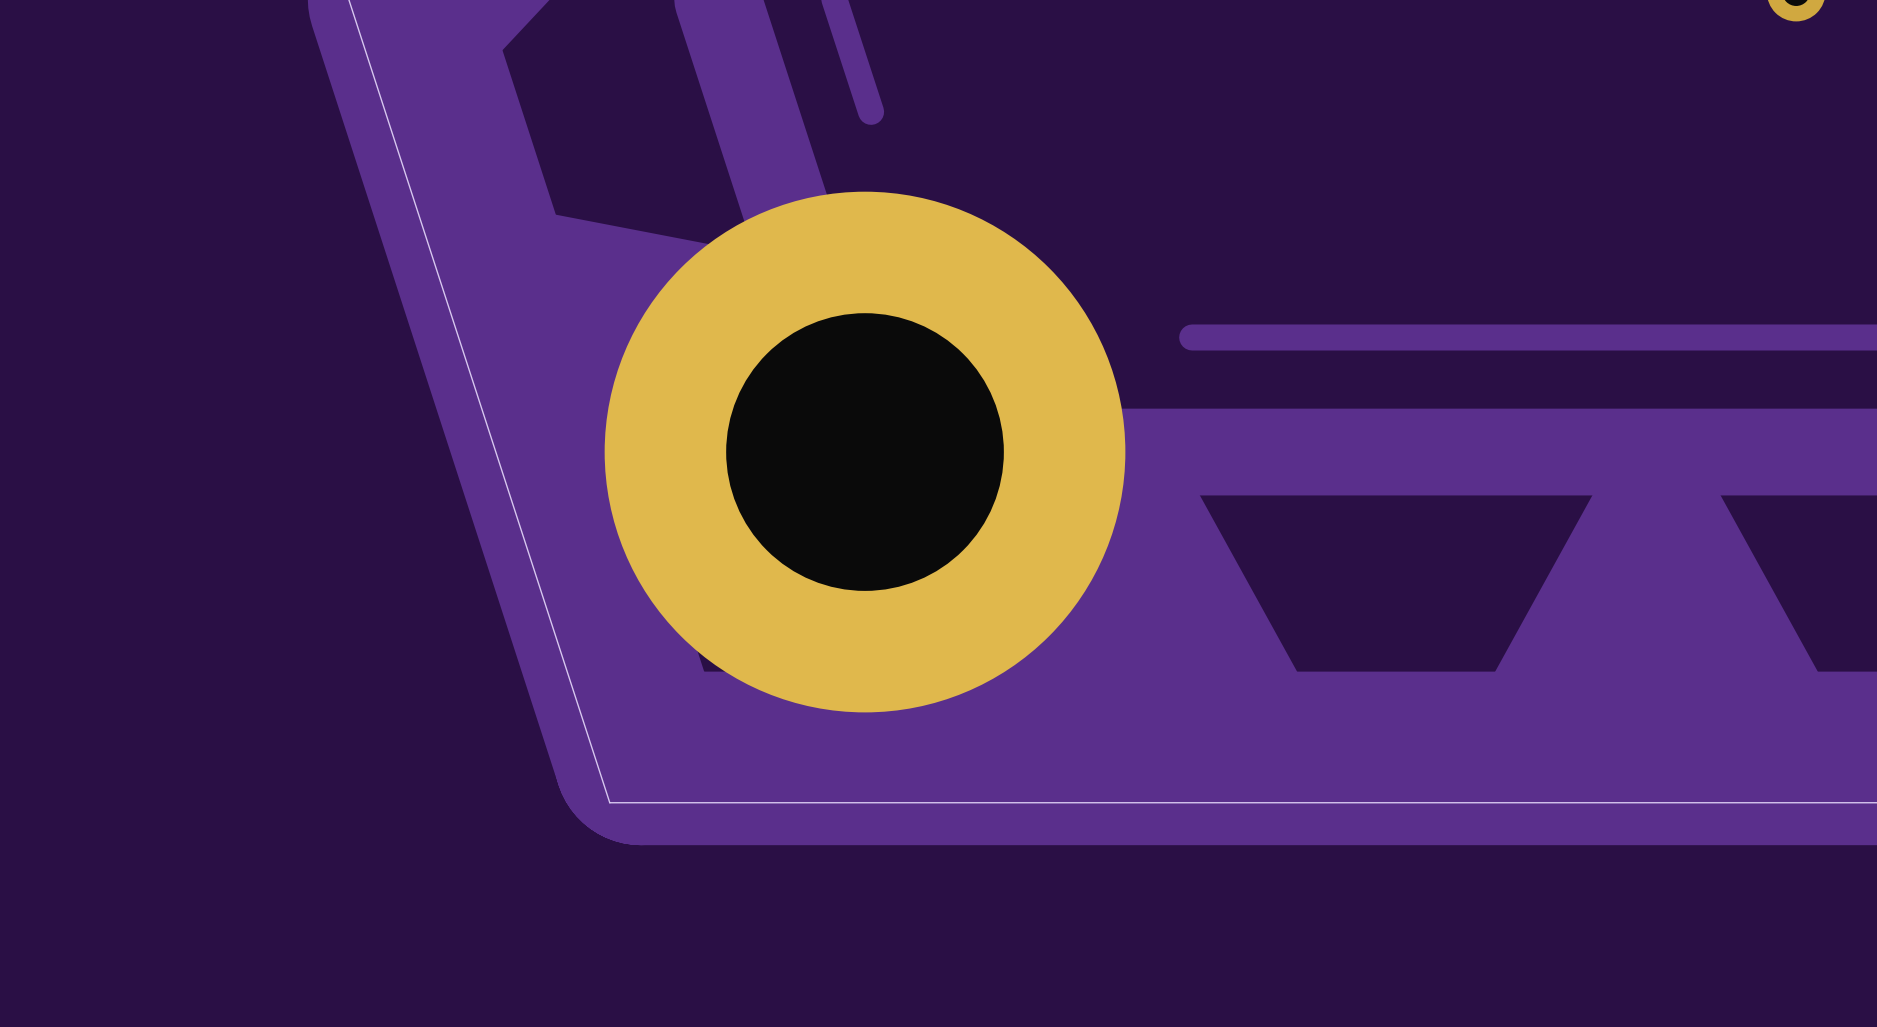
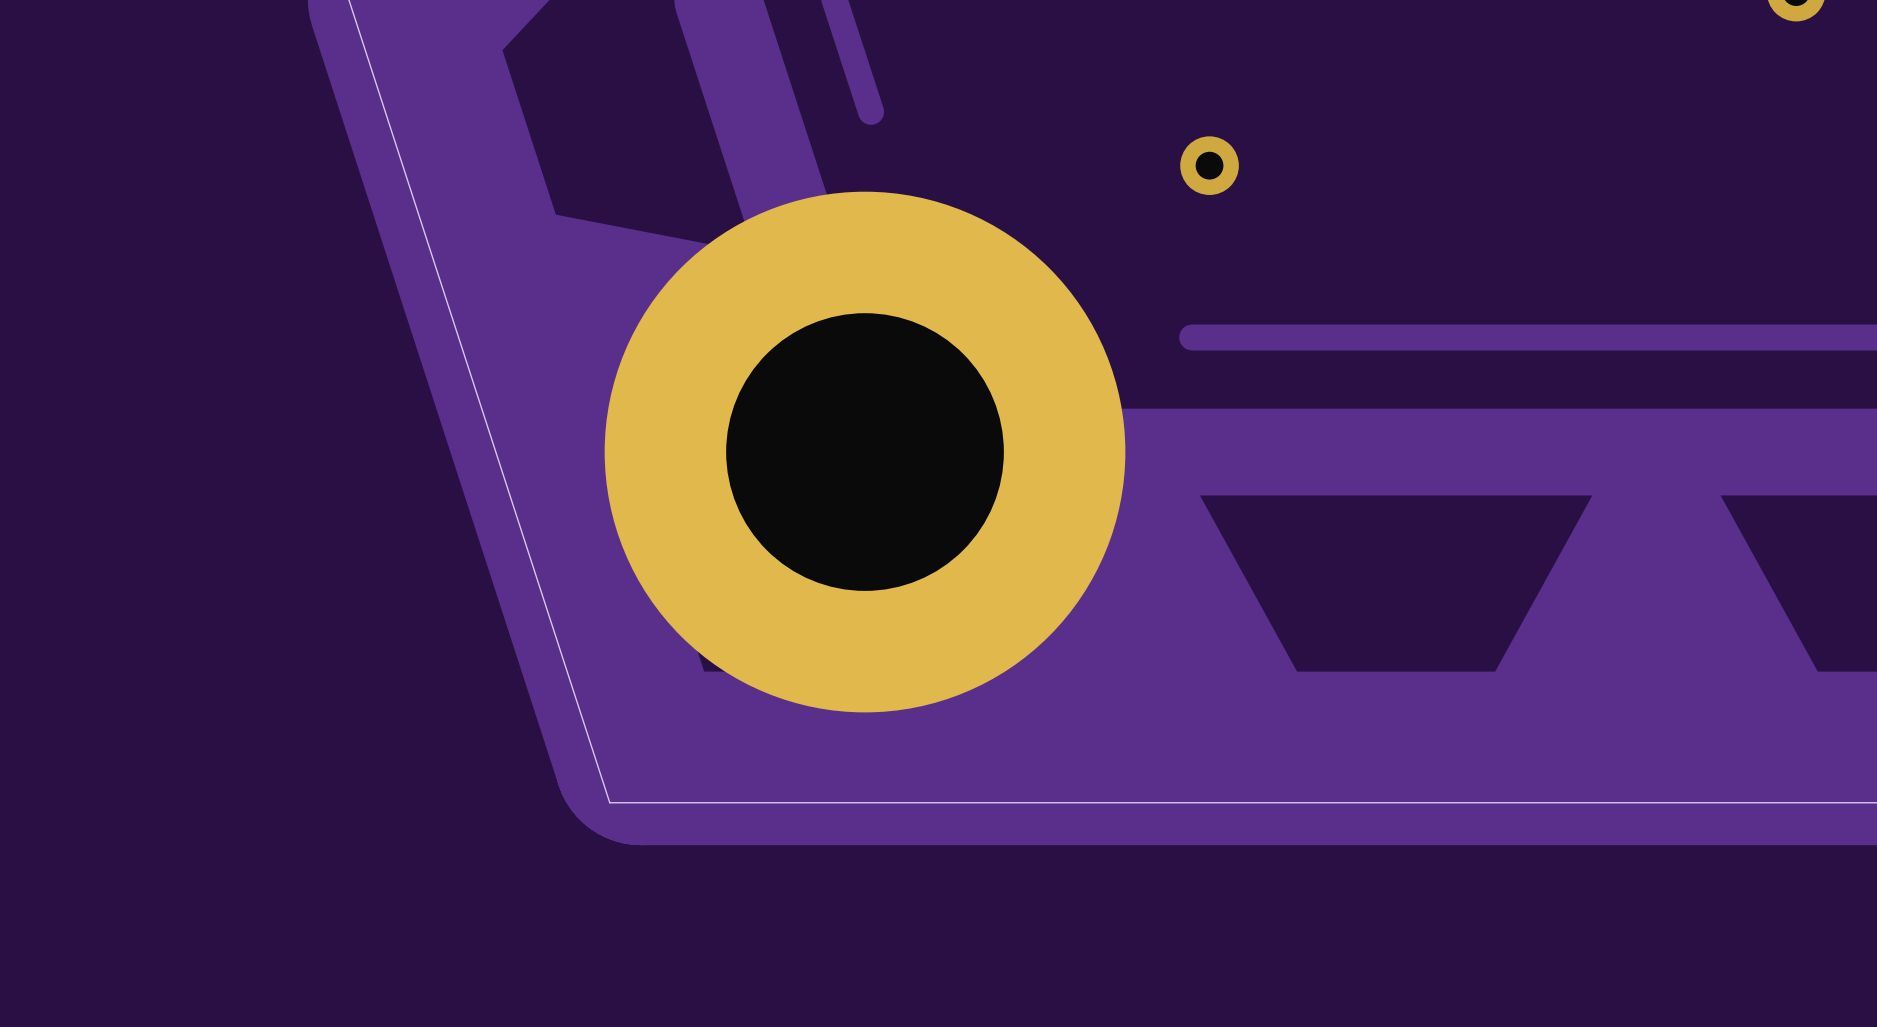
via: none -> (1209, 165)

